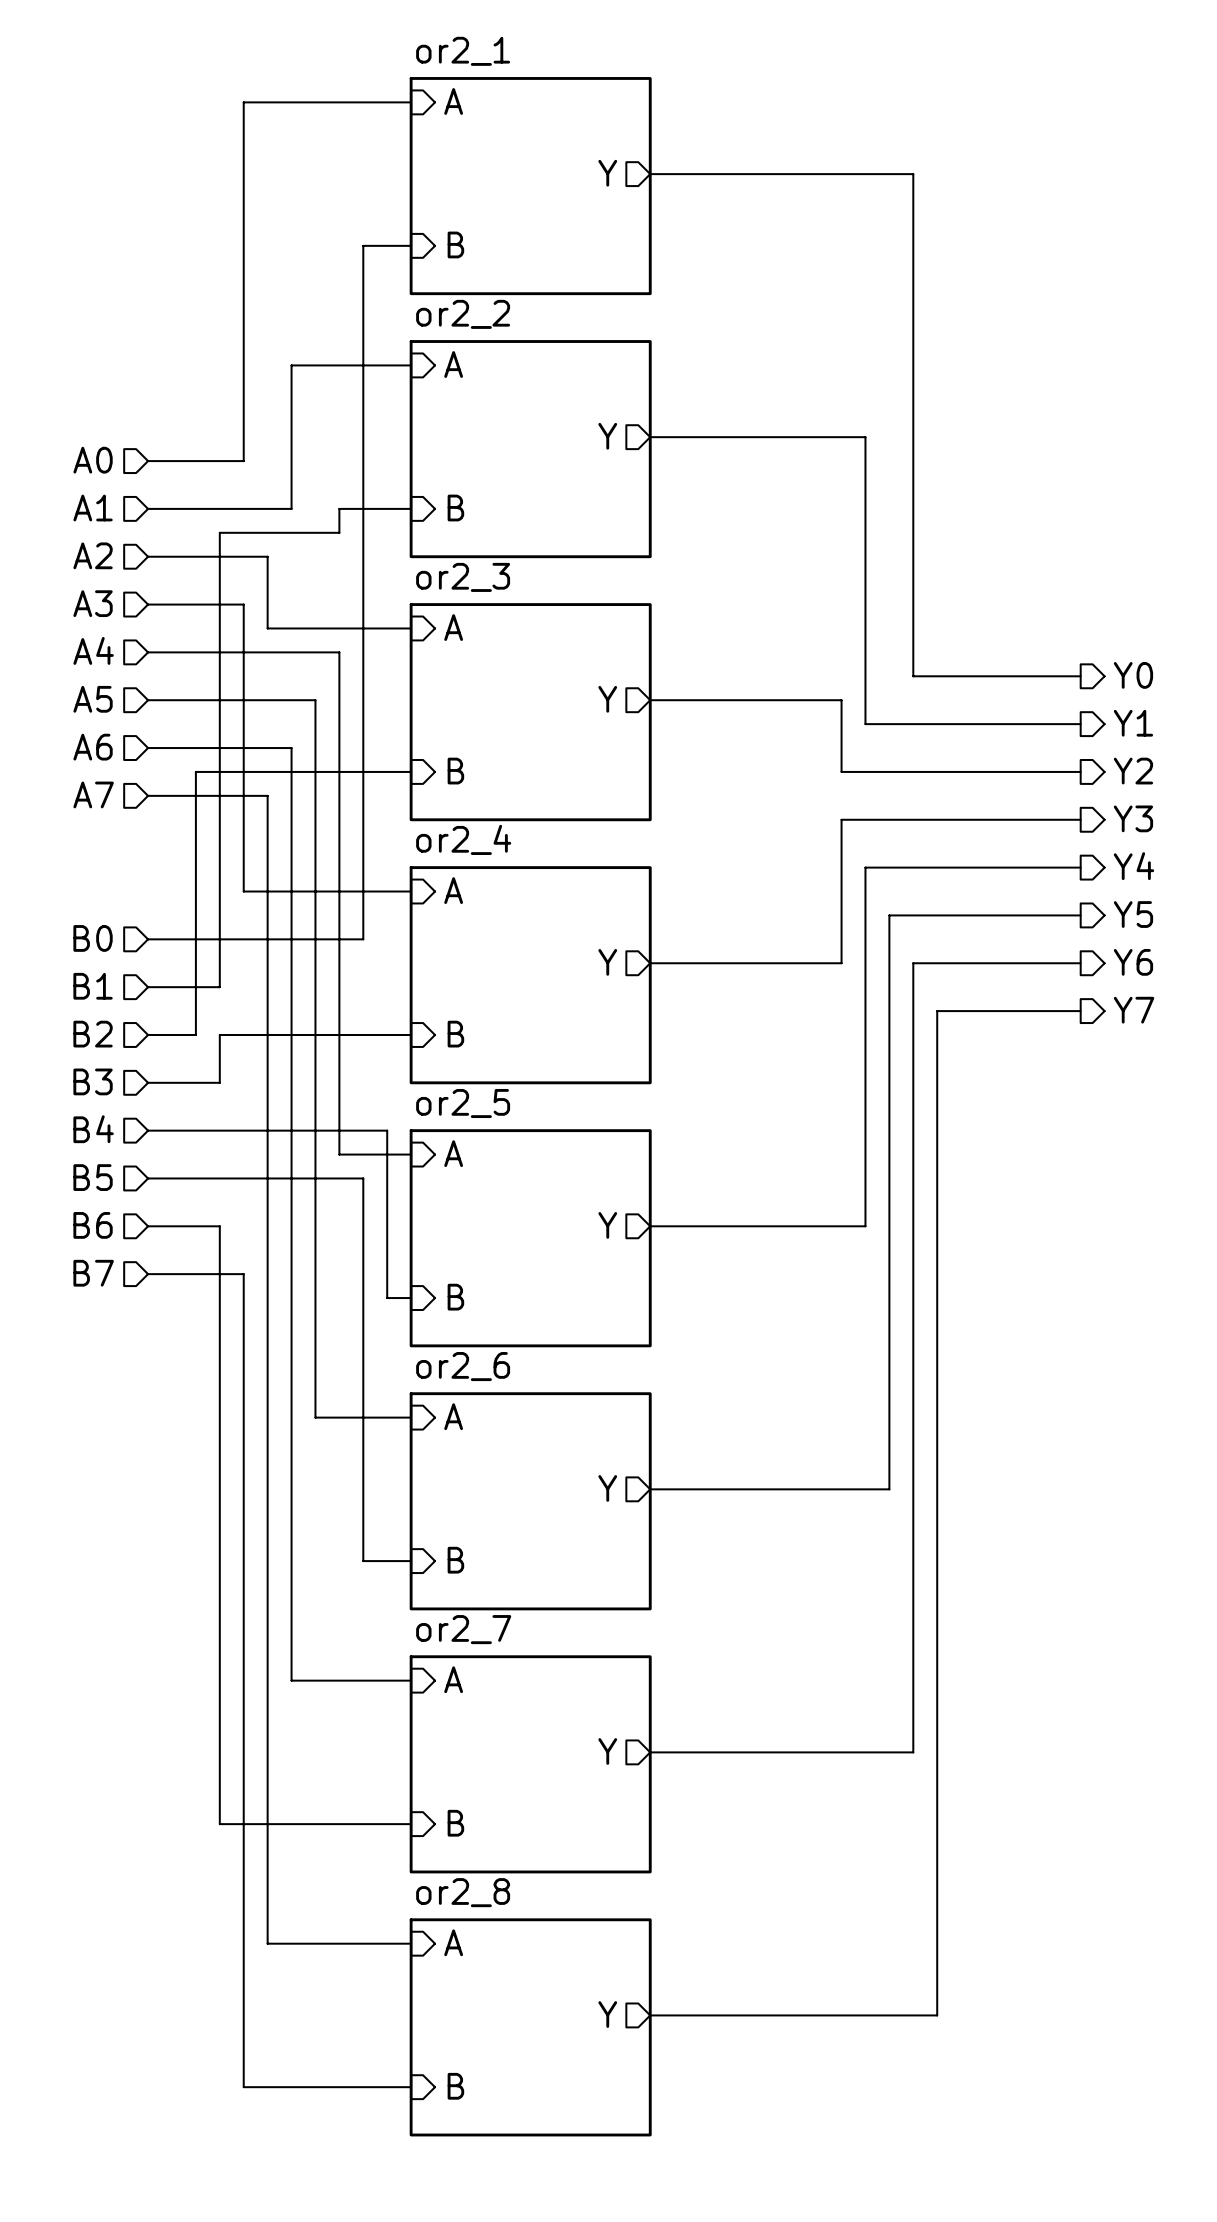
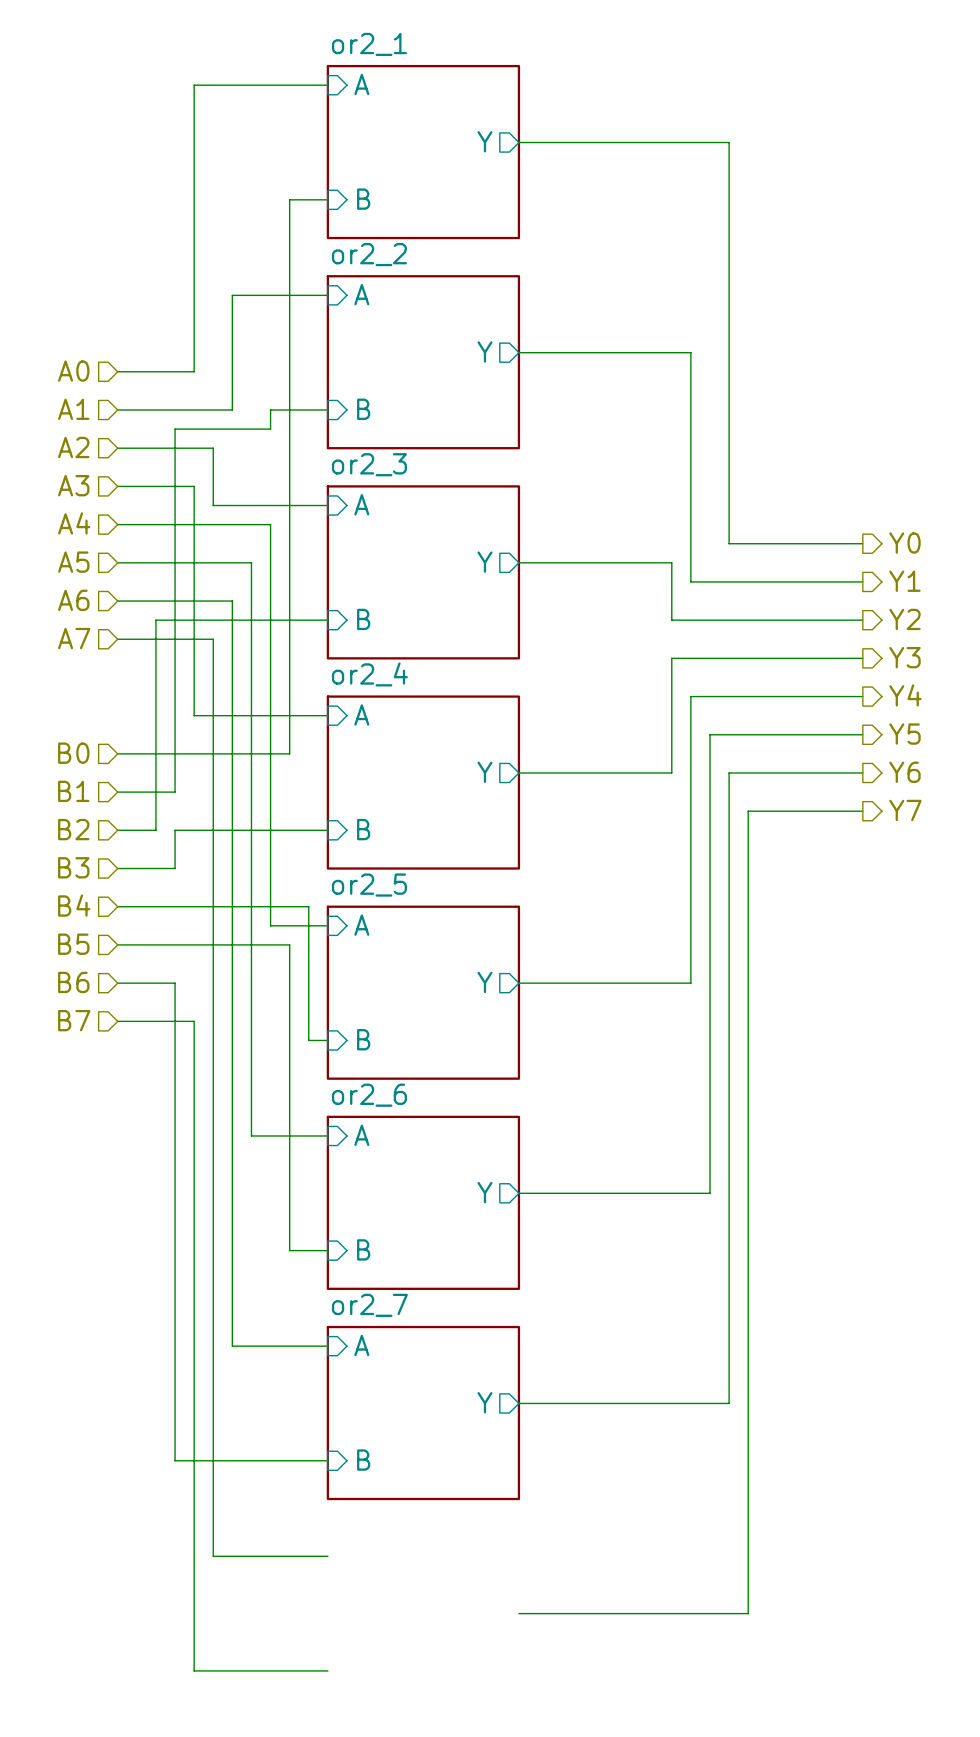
sheet pin: A (453, 1942) -> none
sheet pin: Y (607, 2014) -> none
sheet or2_8: (530, 2027) -> none
sheet pin: B (455, 2086) -> none

